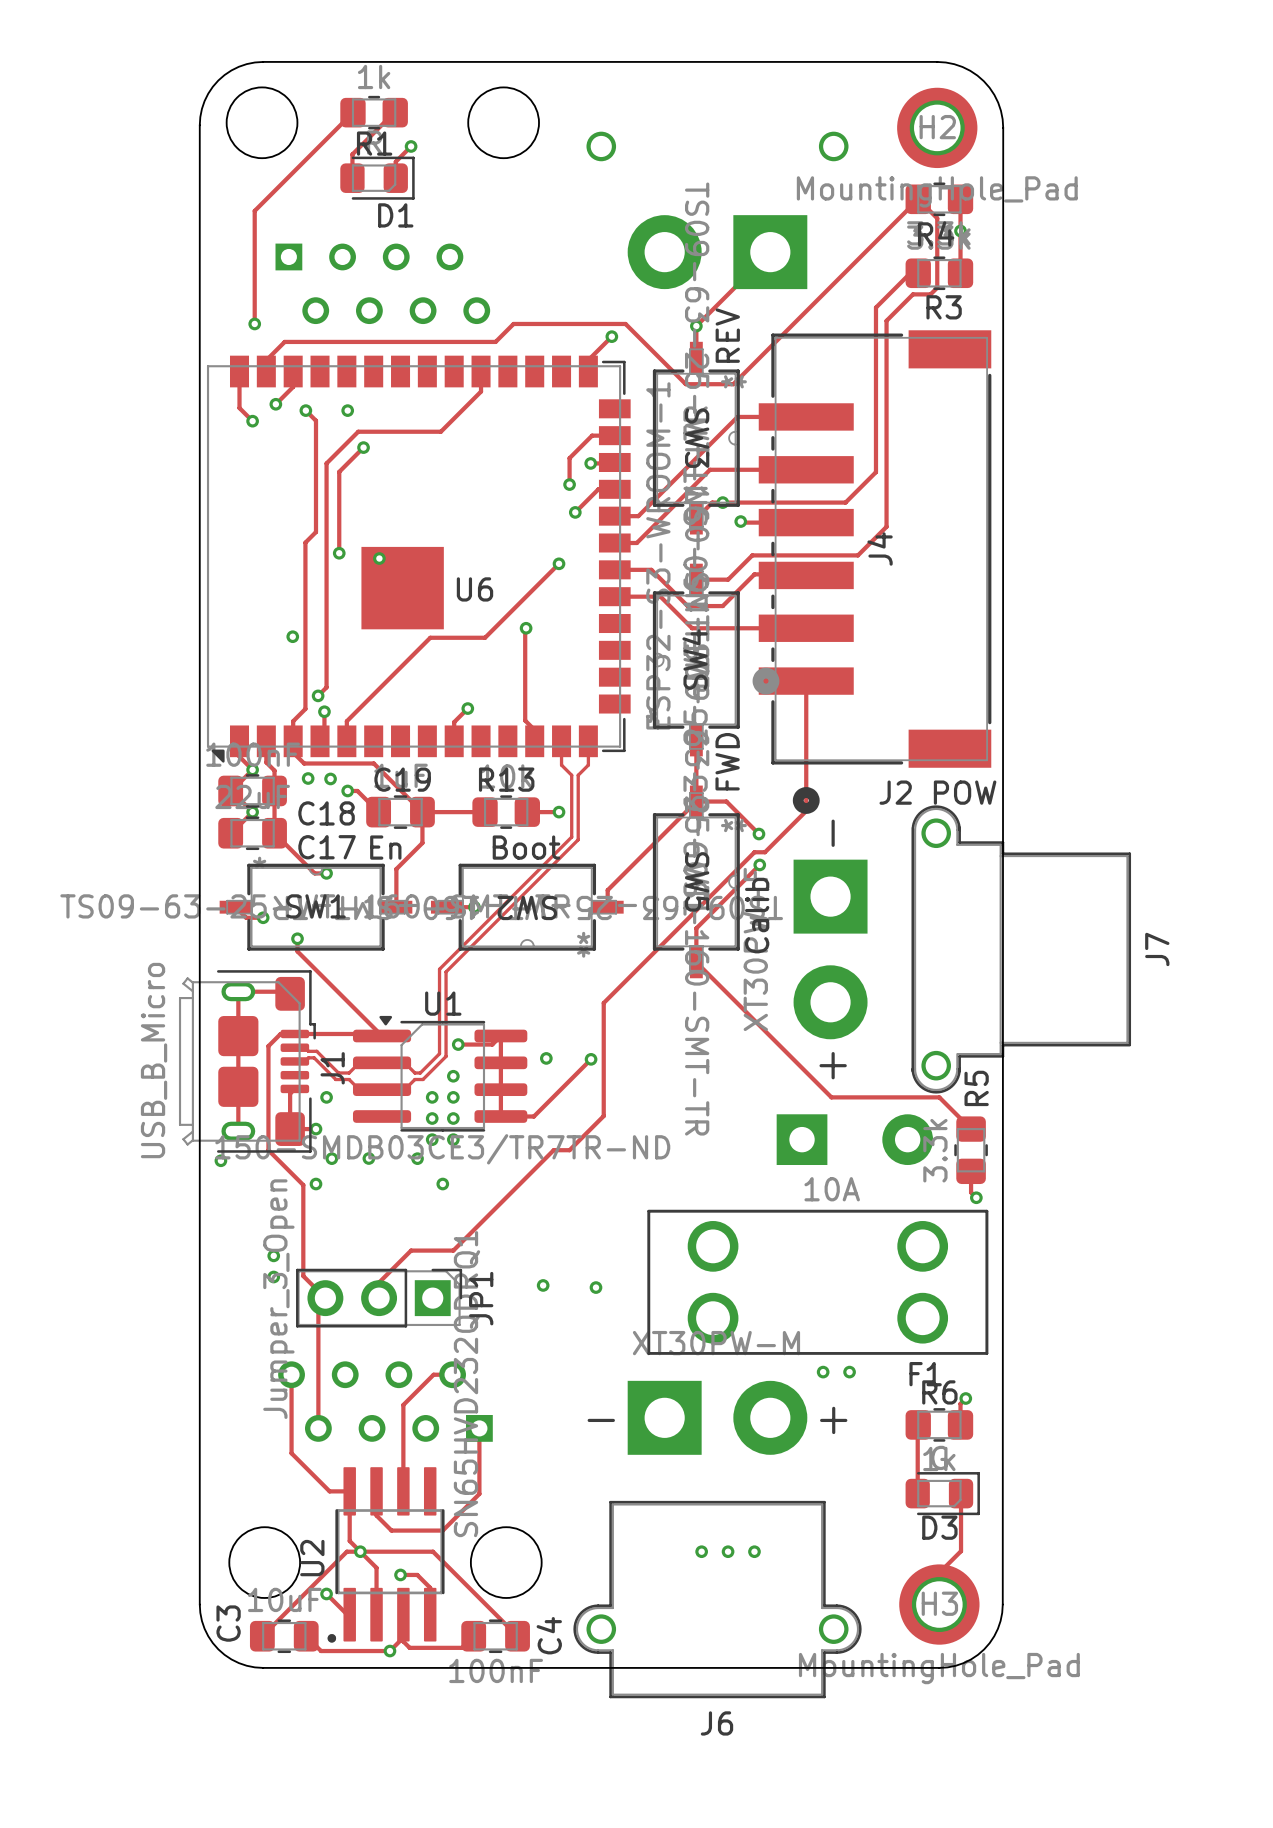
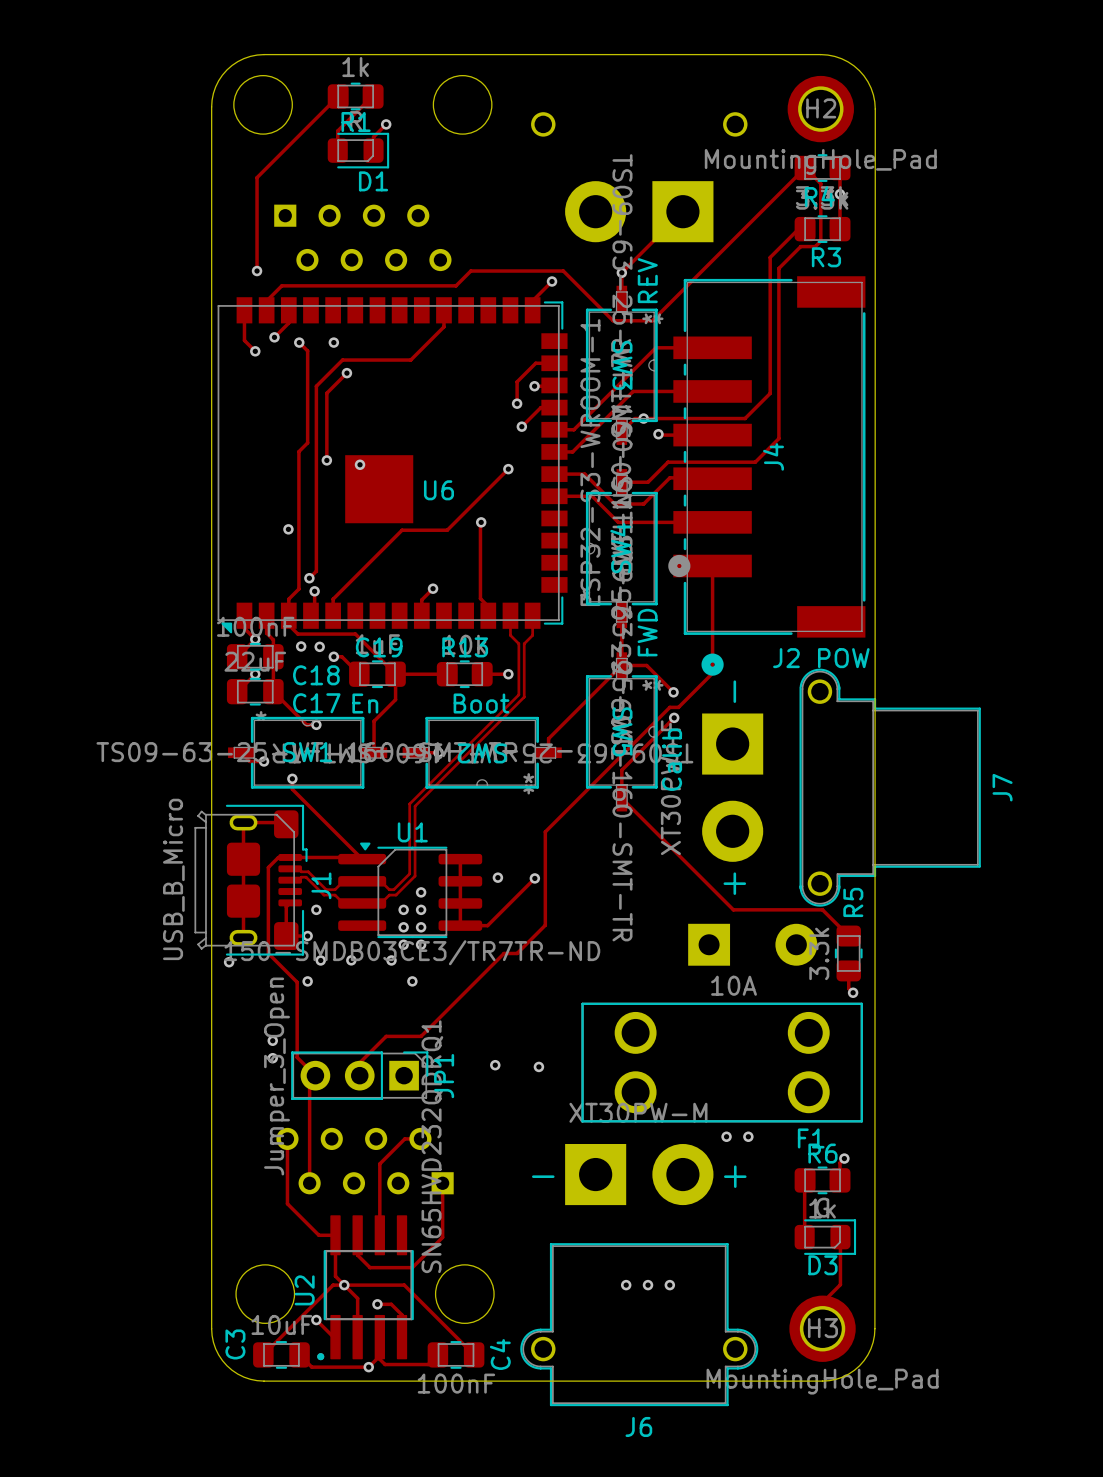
track: (500, 1035) (492, 1044) (458, 1044) -> none
via: (458, 1044) -> none

